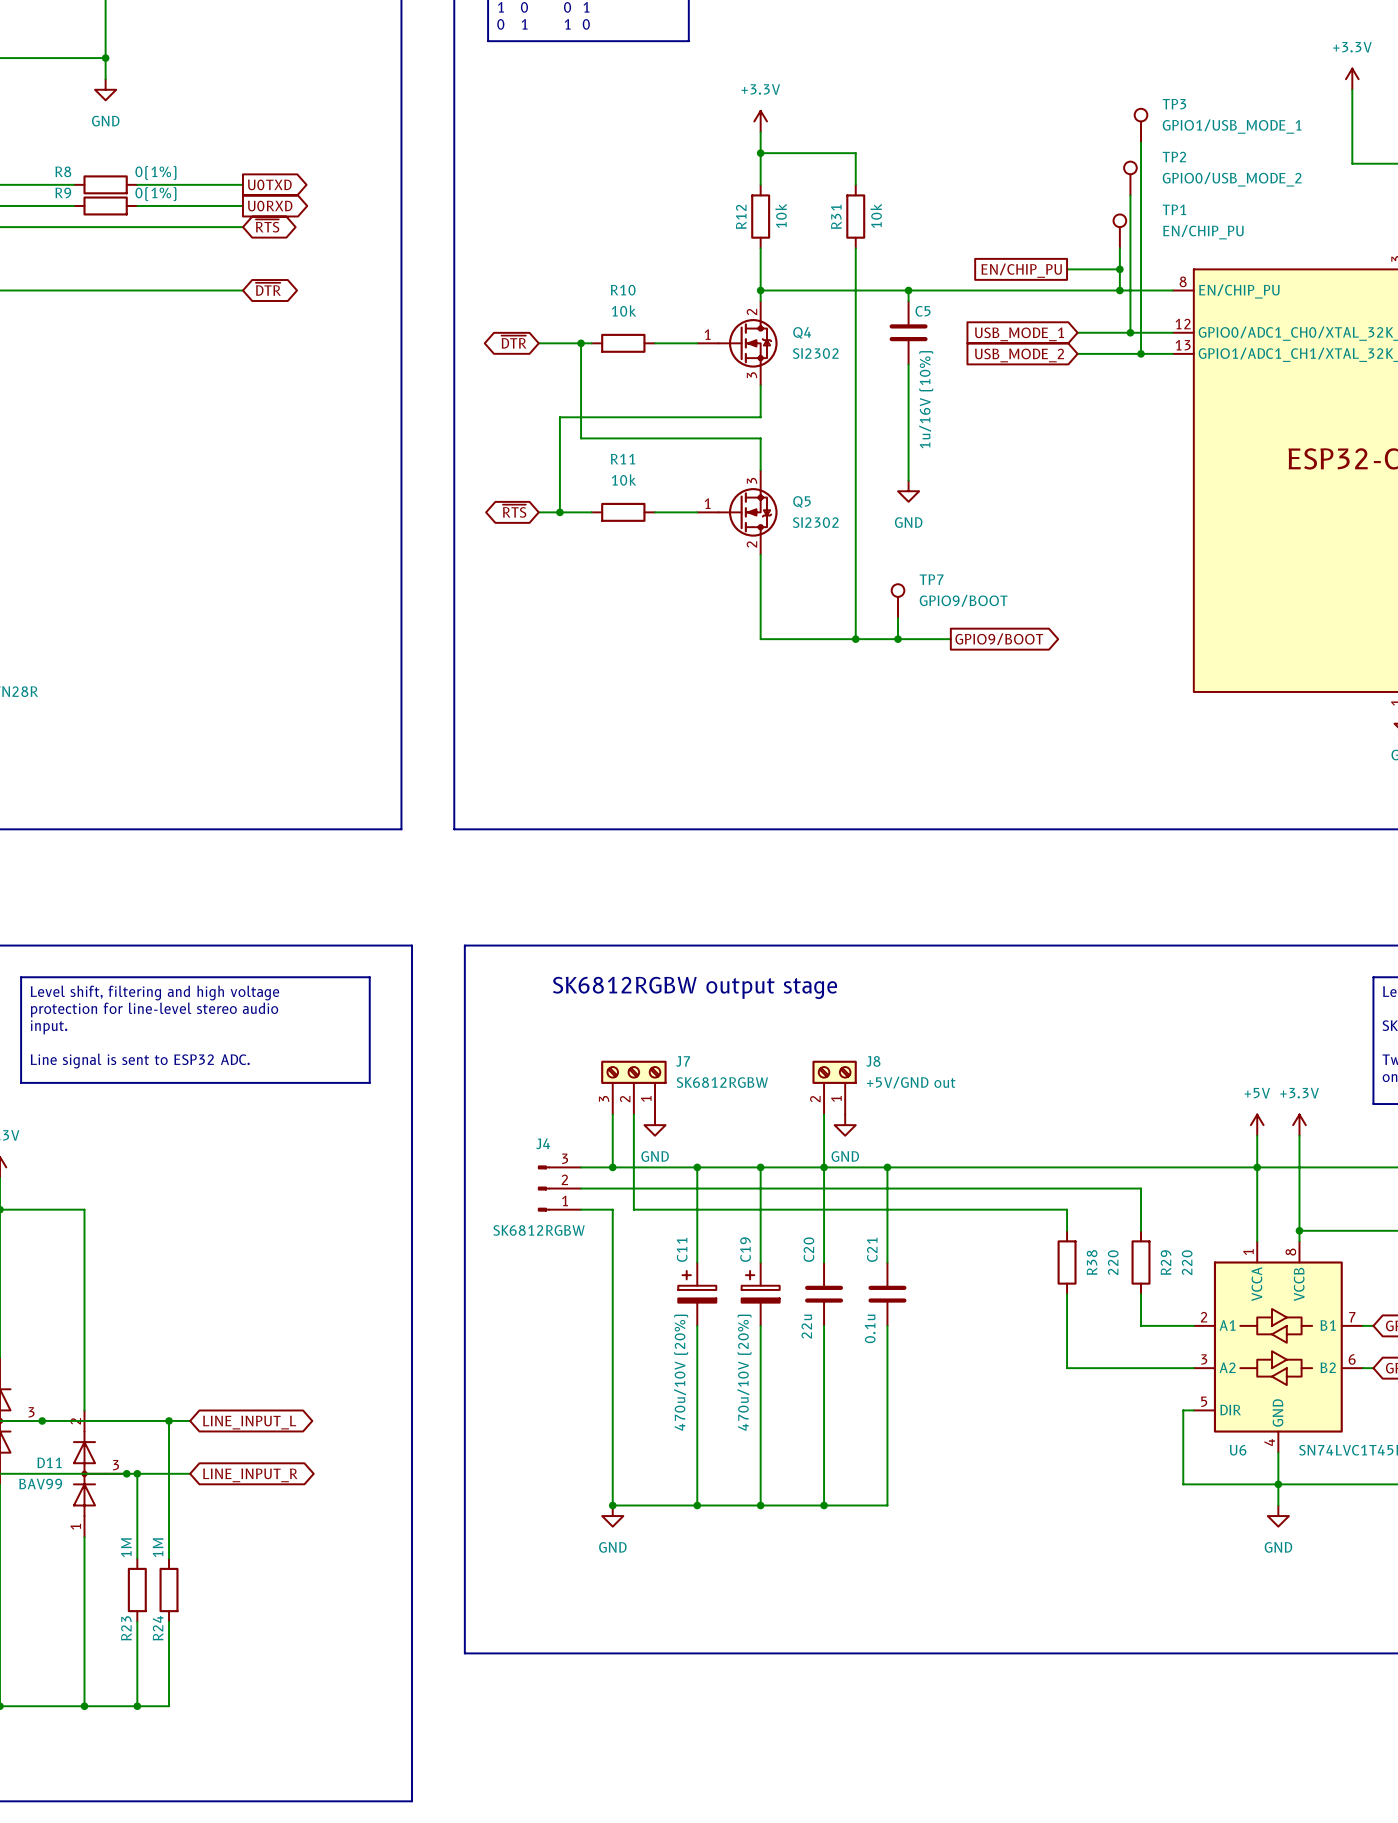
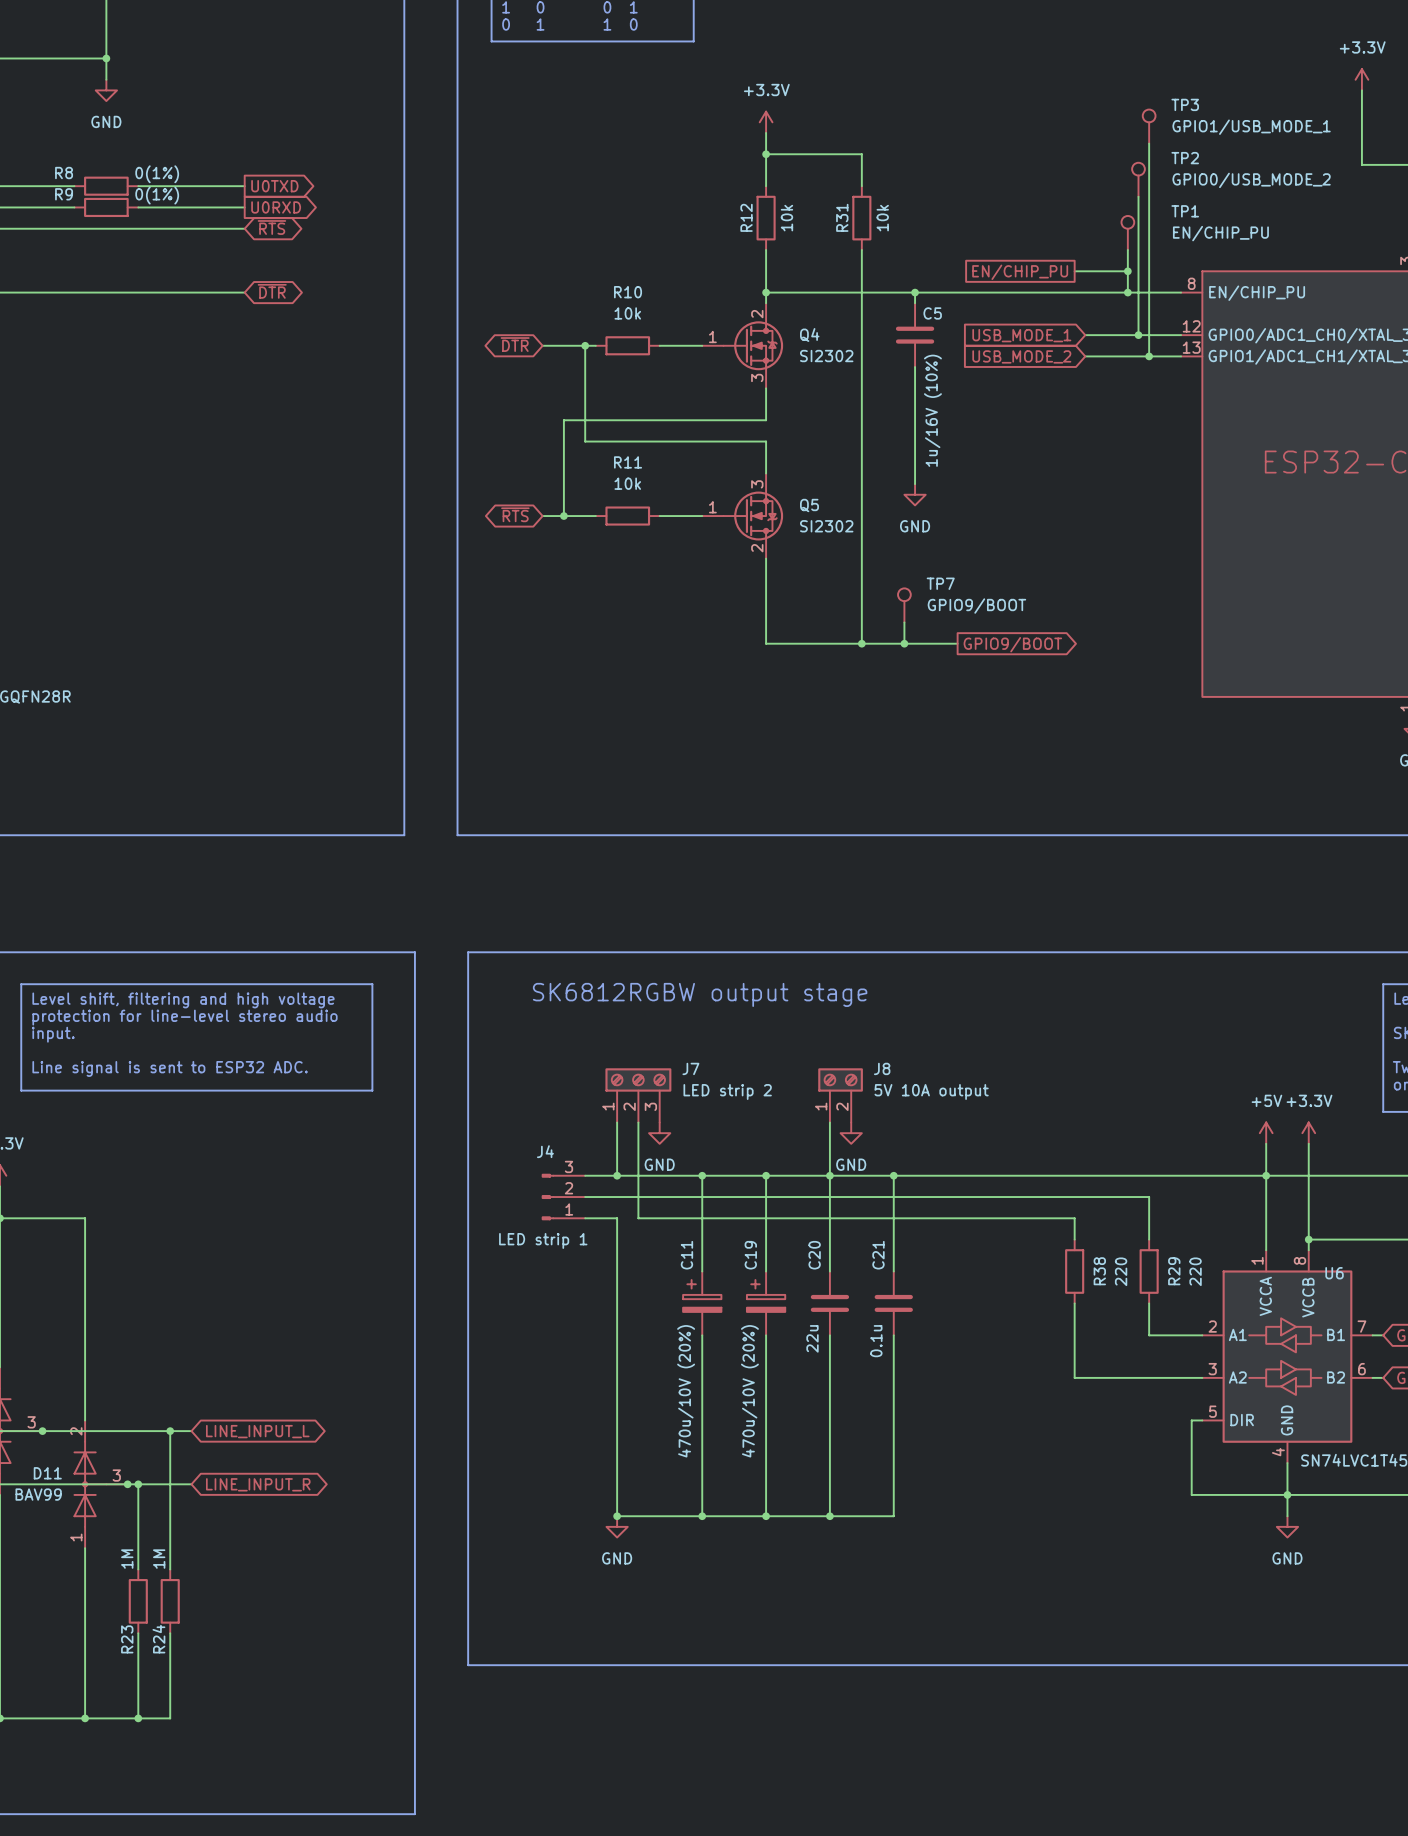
J7 flip: as is (633, 1072) -> left-right (638, 1079)
J8 flip: as is (834, 1072) -> left-right (840, 1079)
J7 value: SK6812RGBW (722, 1082) -> LED strip 2 (727, 1091)
J8 value: +5V/GND out (911, 1082) -> 5V 10A output (931, 1091)
J4 value: SK6812RGBW (539, 1230) -> LED strip 1 (543, 1240)
U6 name position: U6 (1238, 1450) -> U6 (1334, 1273)

